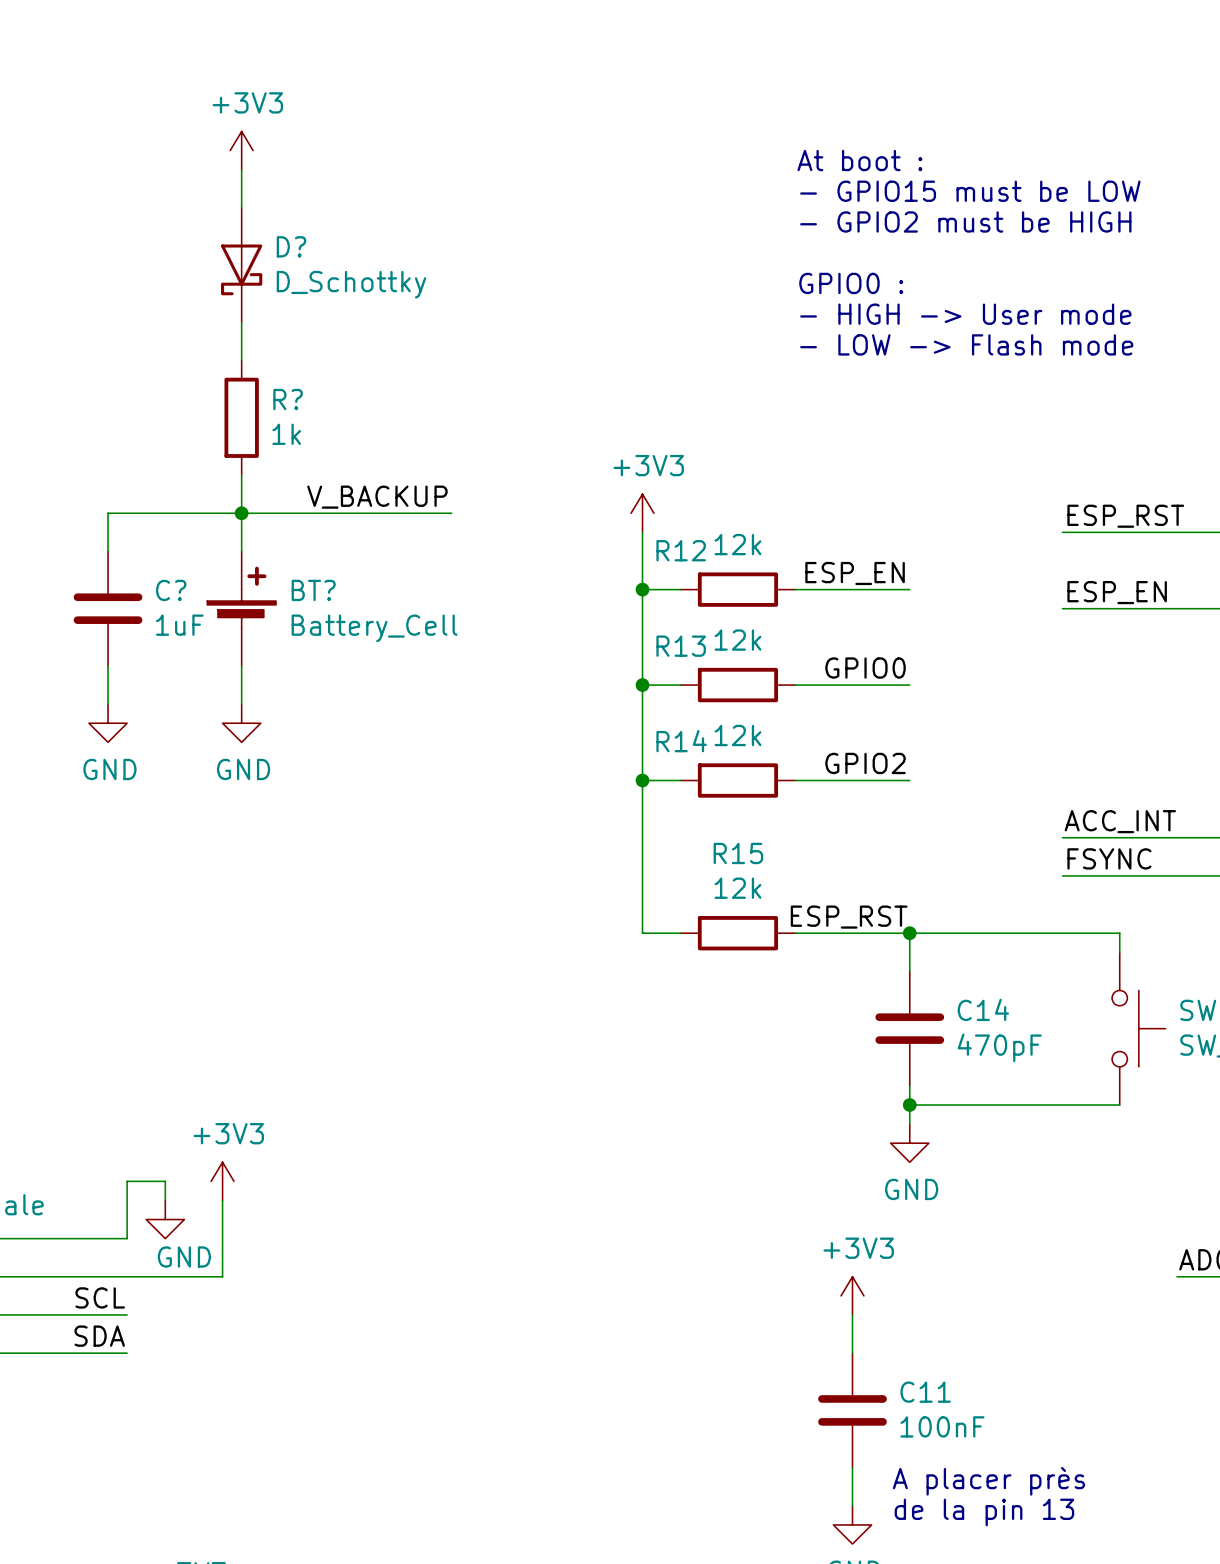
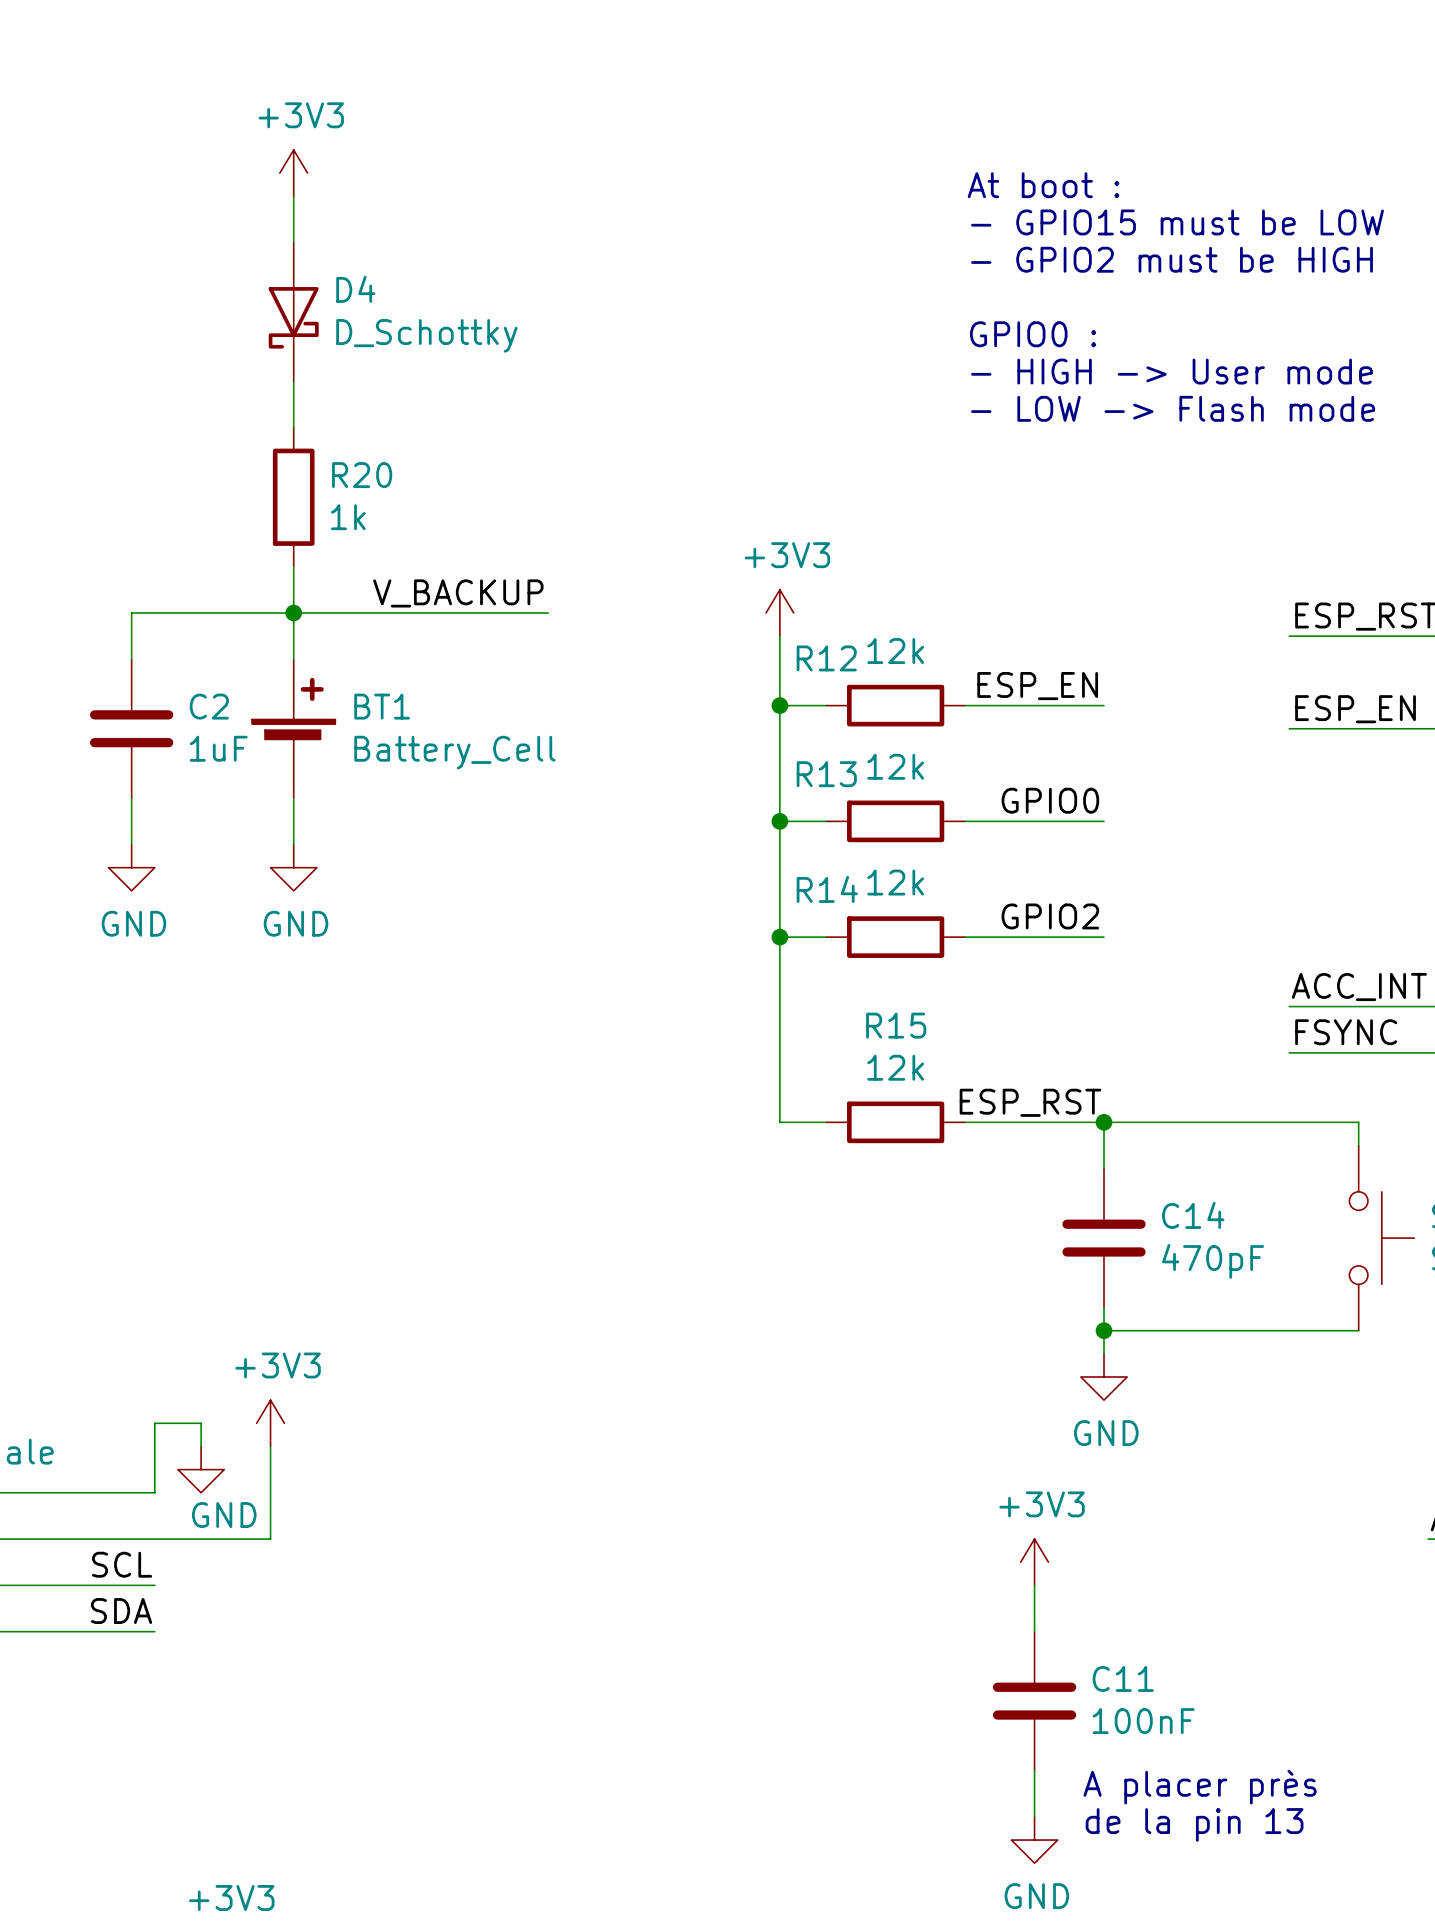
D? name: D? (291, 246) -> D4 (355, 289)
R? name: R? (288, 399) -> R20 (362, 475)
C? name: C? (171, 590) -> C2 (209, 706)
BT? name: BT? (313, 590) -> BT1 (382, 706)

